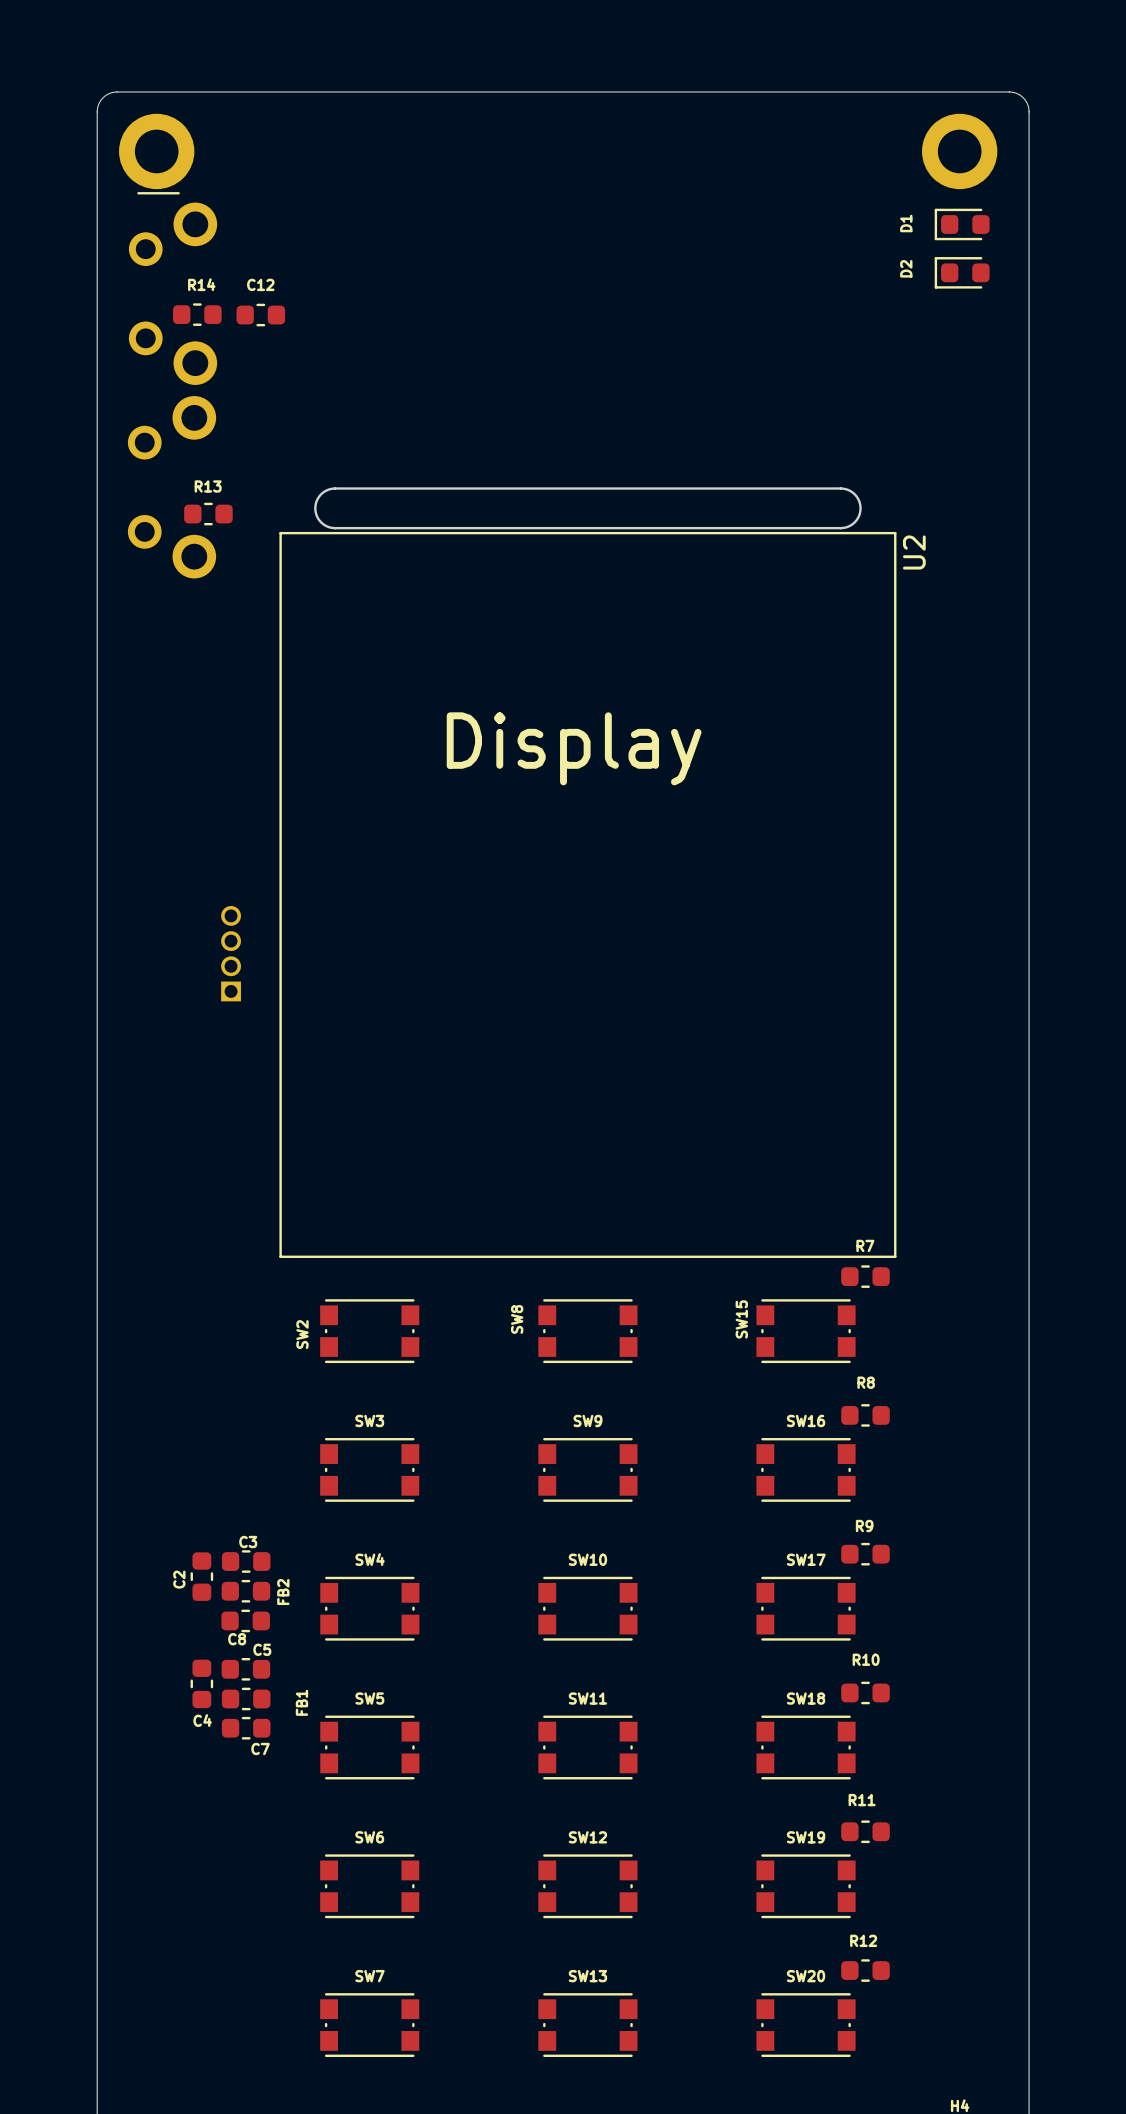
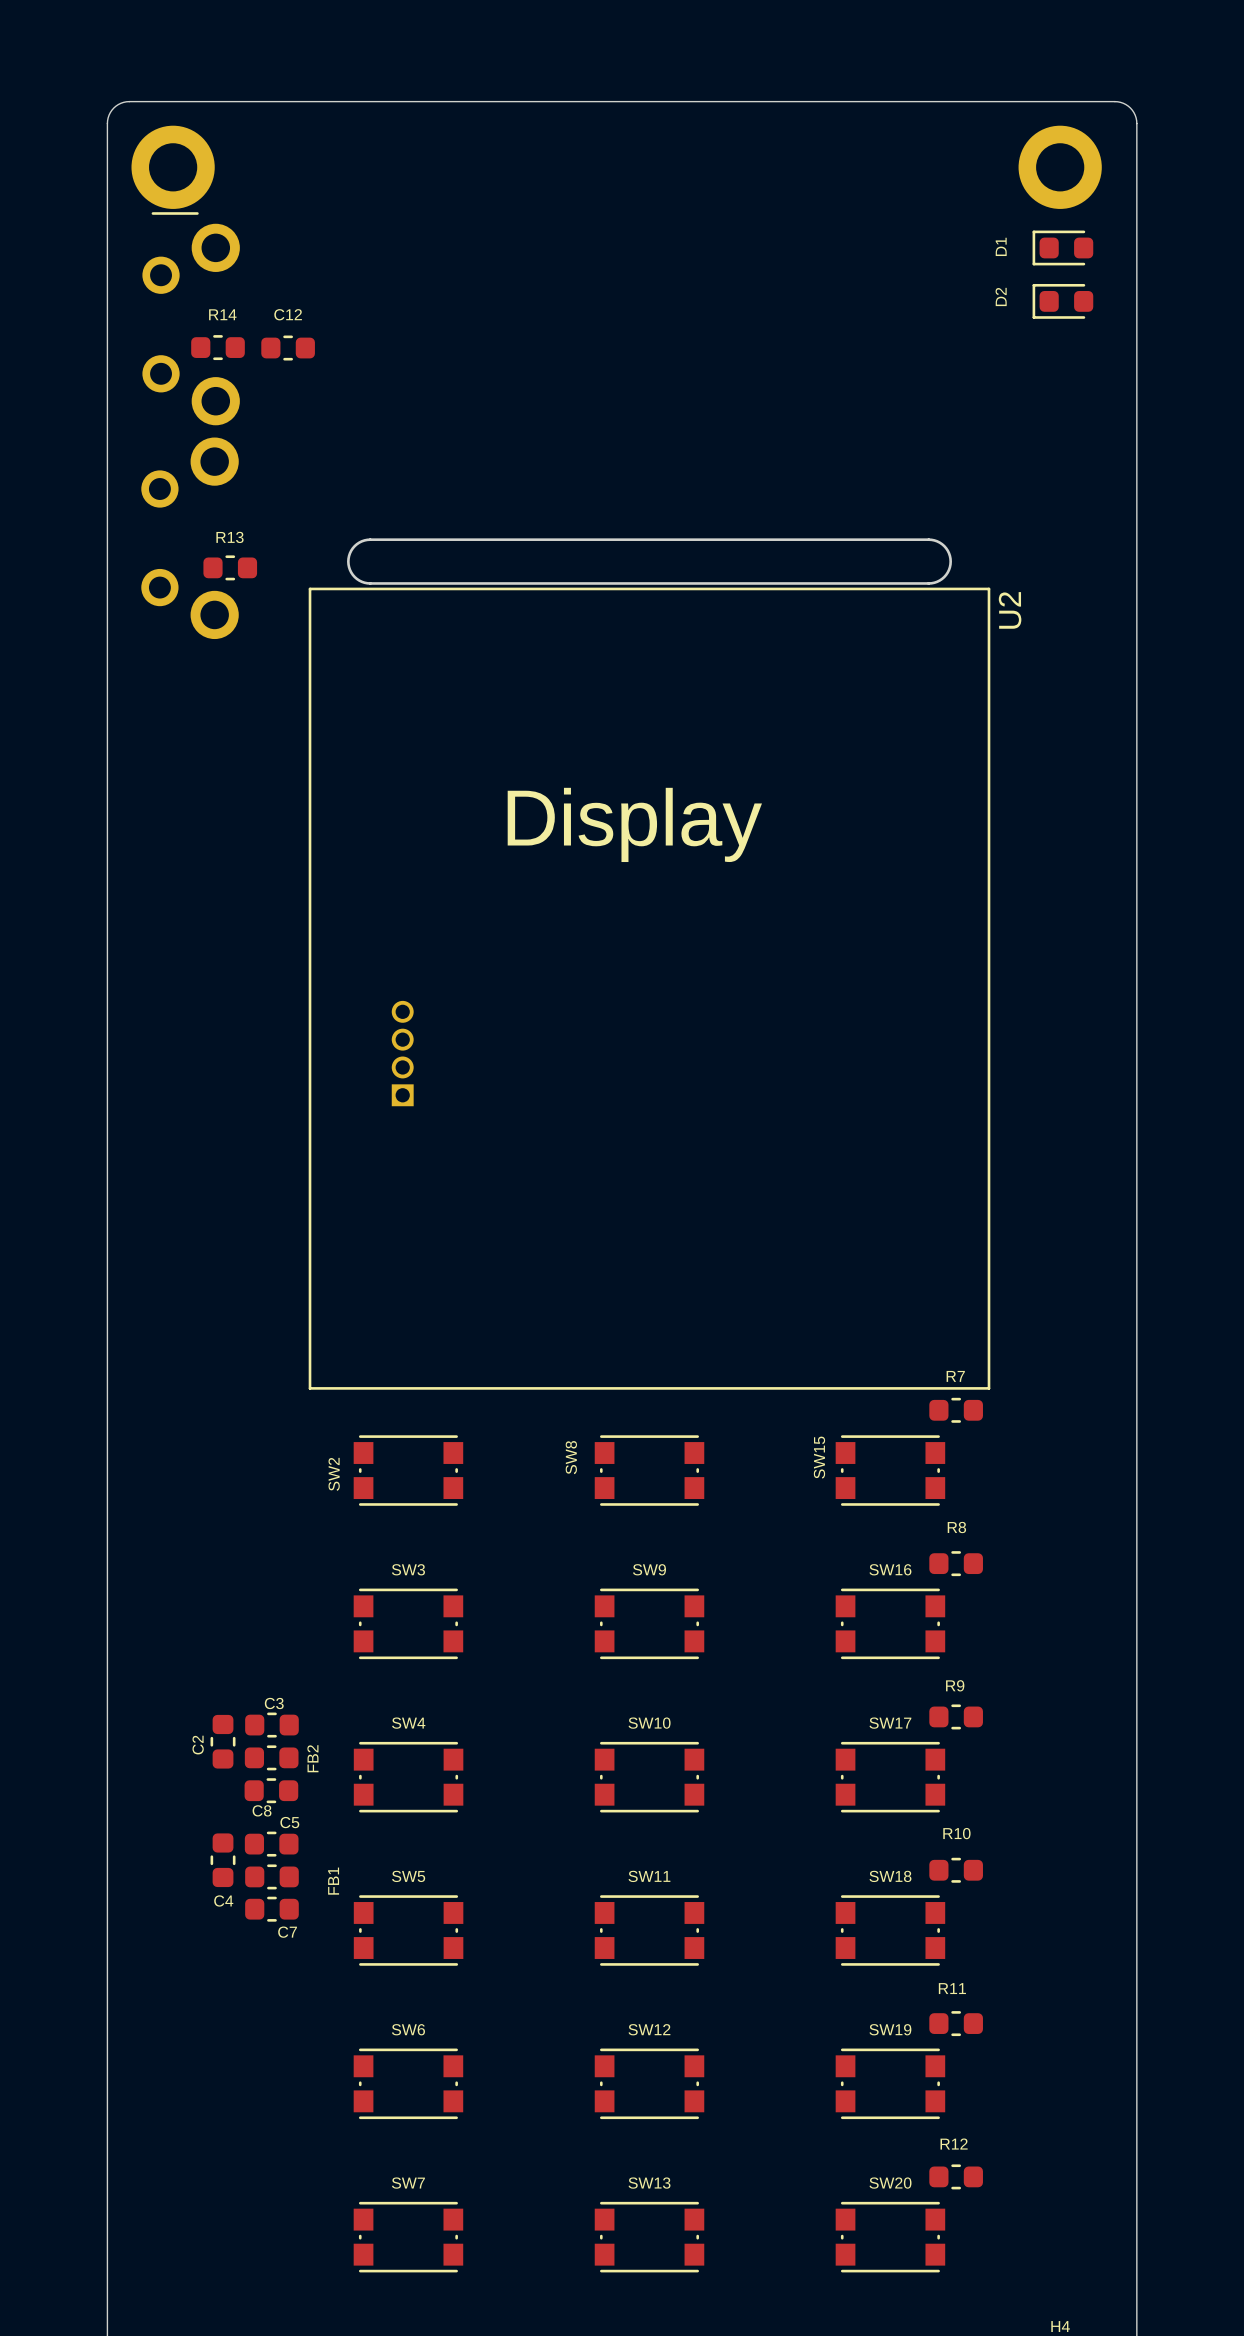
part position: (231, 953) -> (402, 1053)

